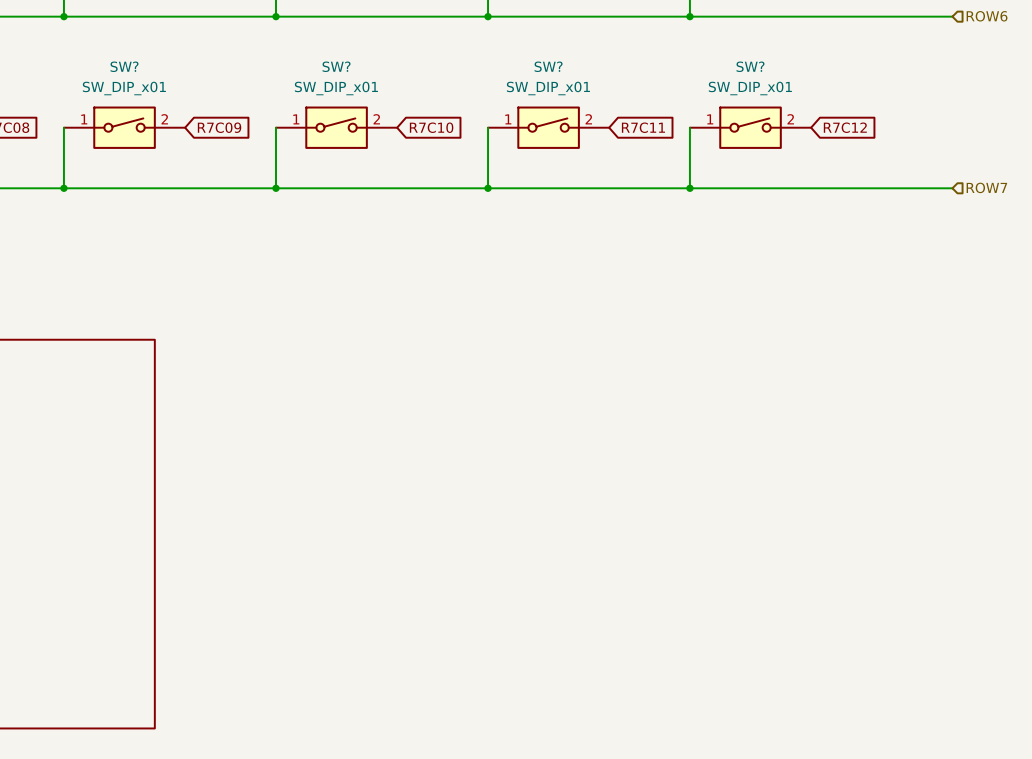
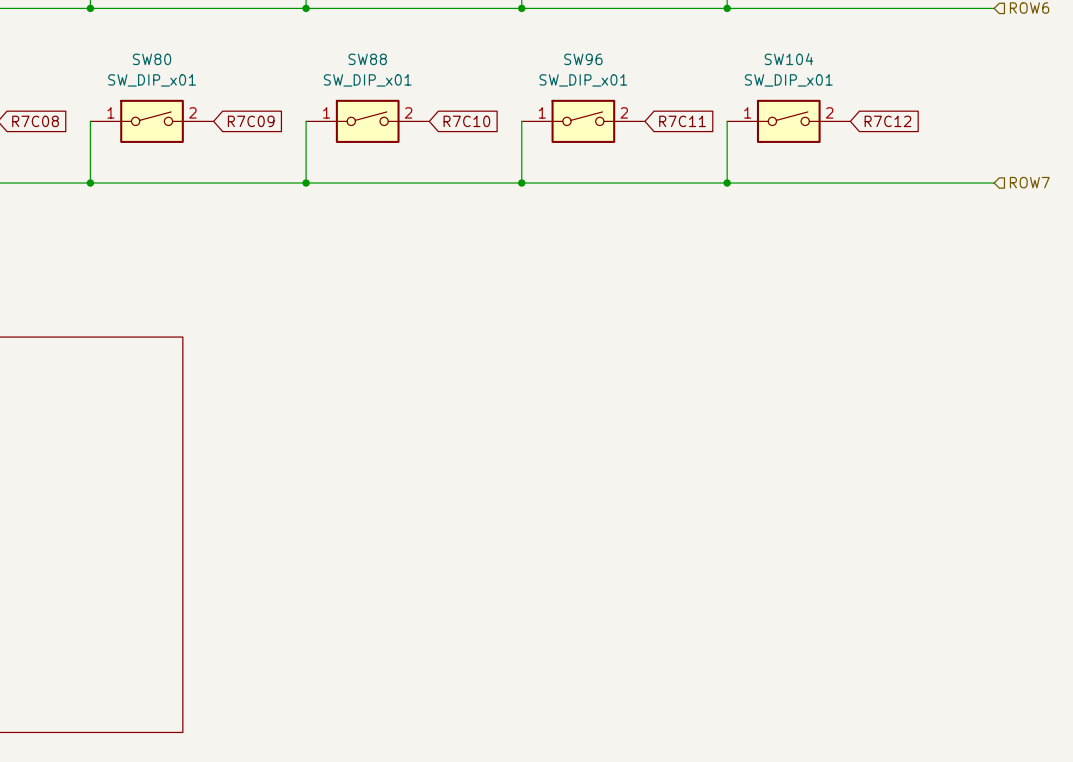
SW? name: SW? (124, 66) -> SW80 (152, 59)
SW? name: SW? (336, 66) -> SW88 (367, 59)
SW? name: SW? (548, 66) -> SW96 (583, 59)
SW? name: SW? (750, 66) -> SW104 (789, 59)

